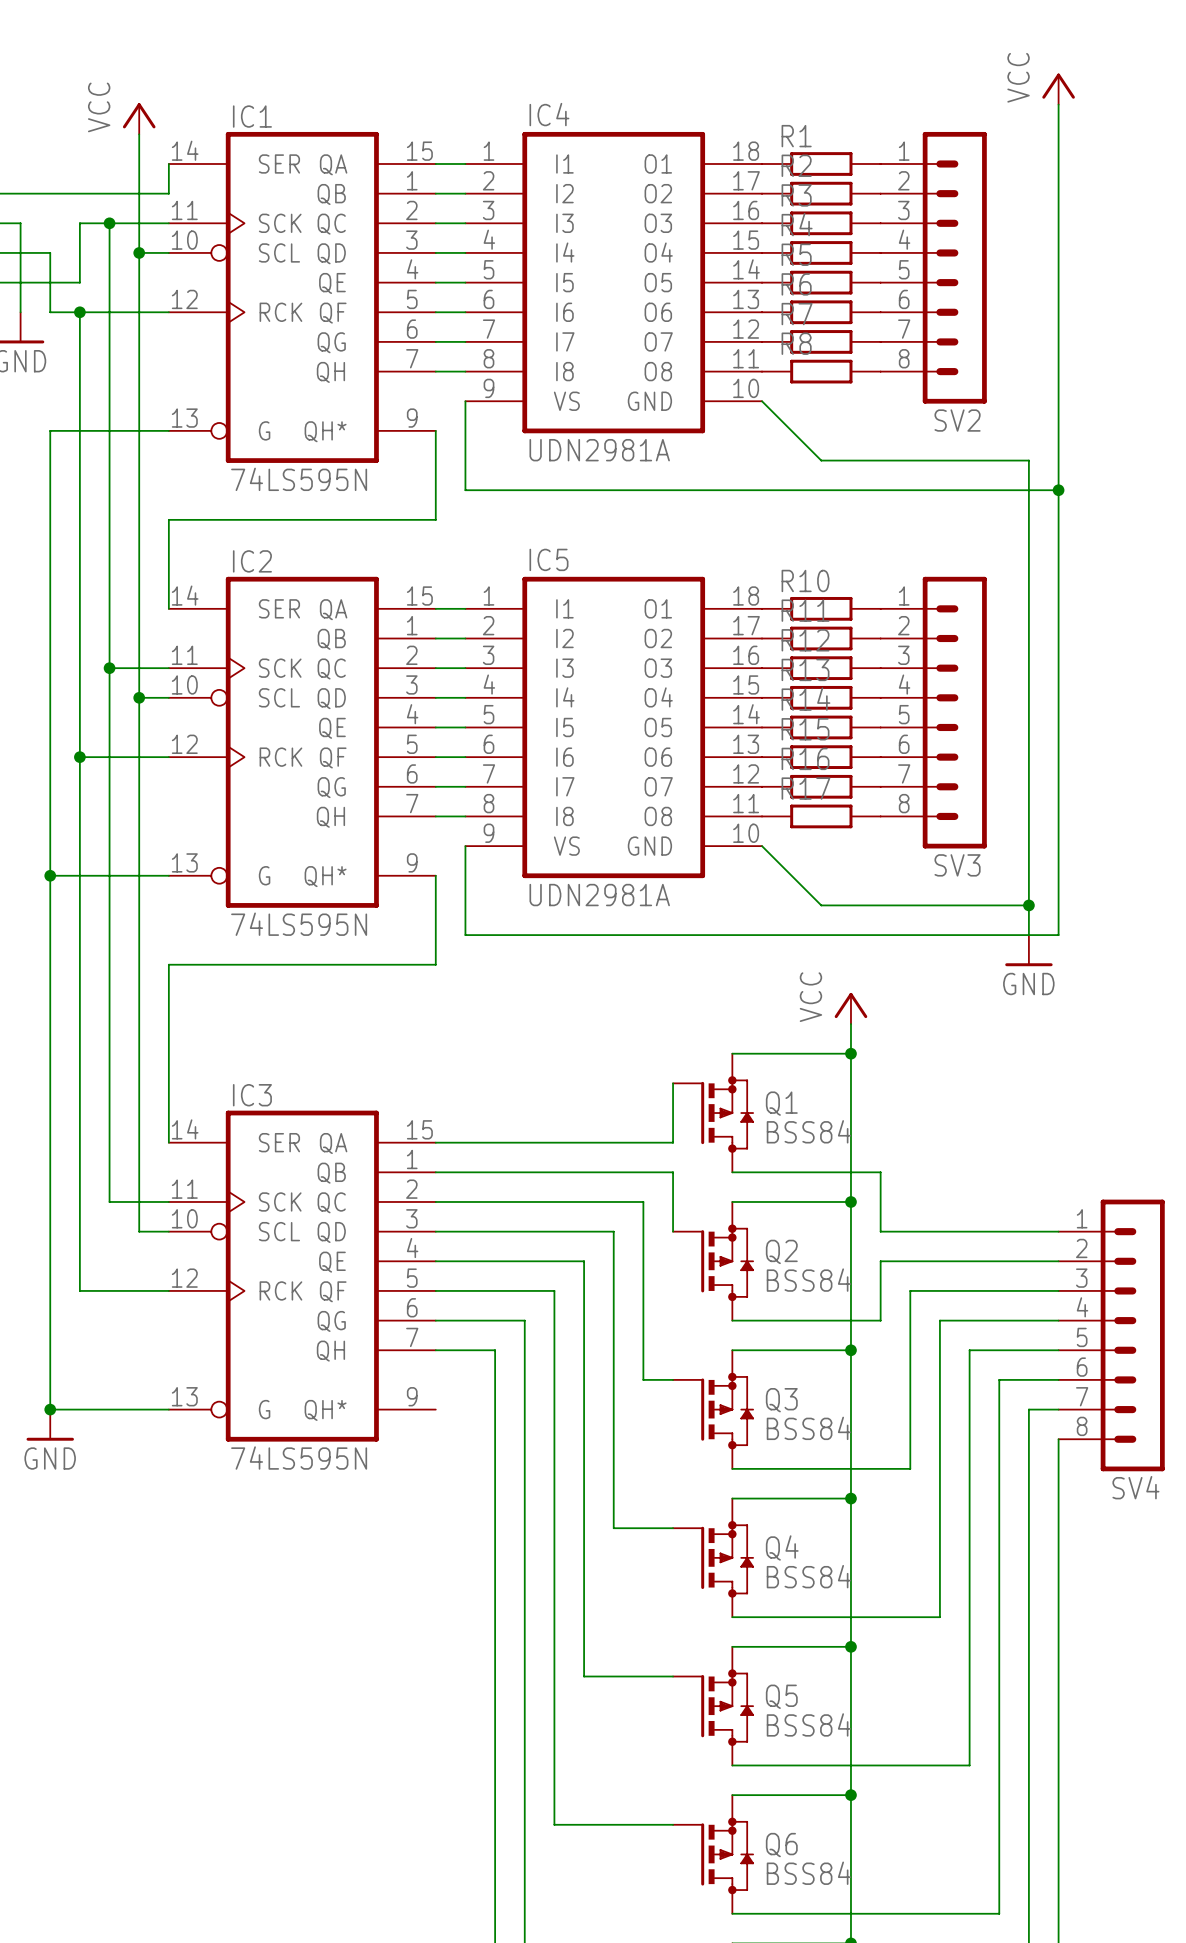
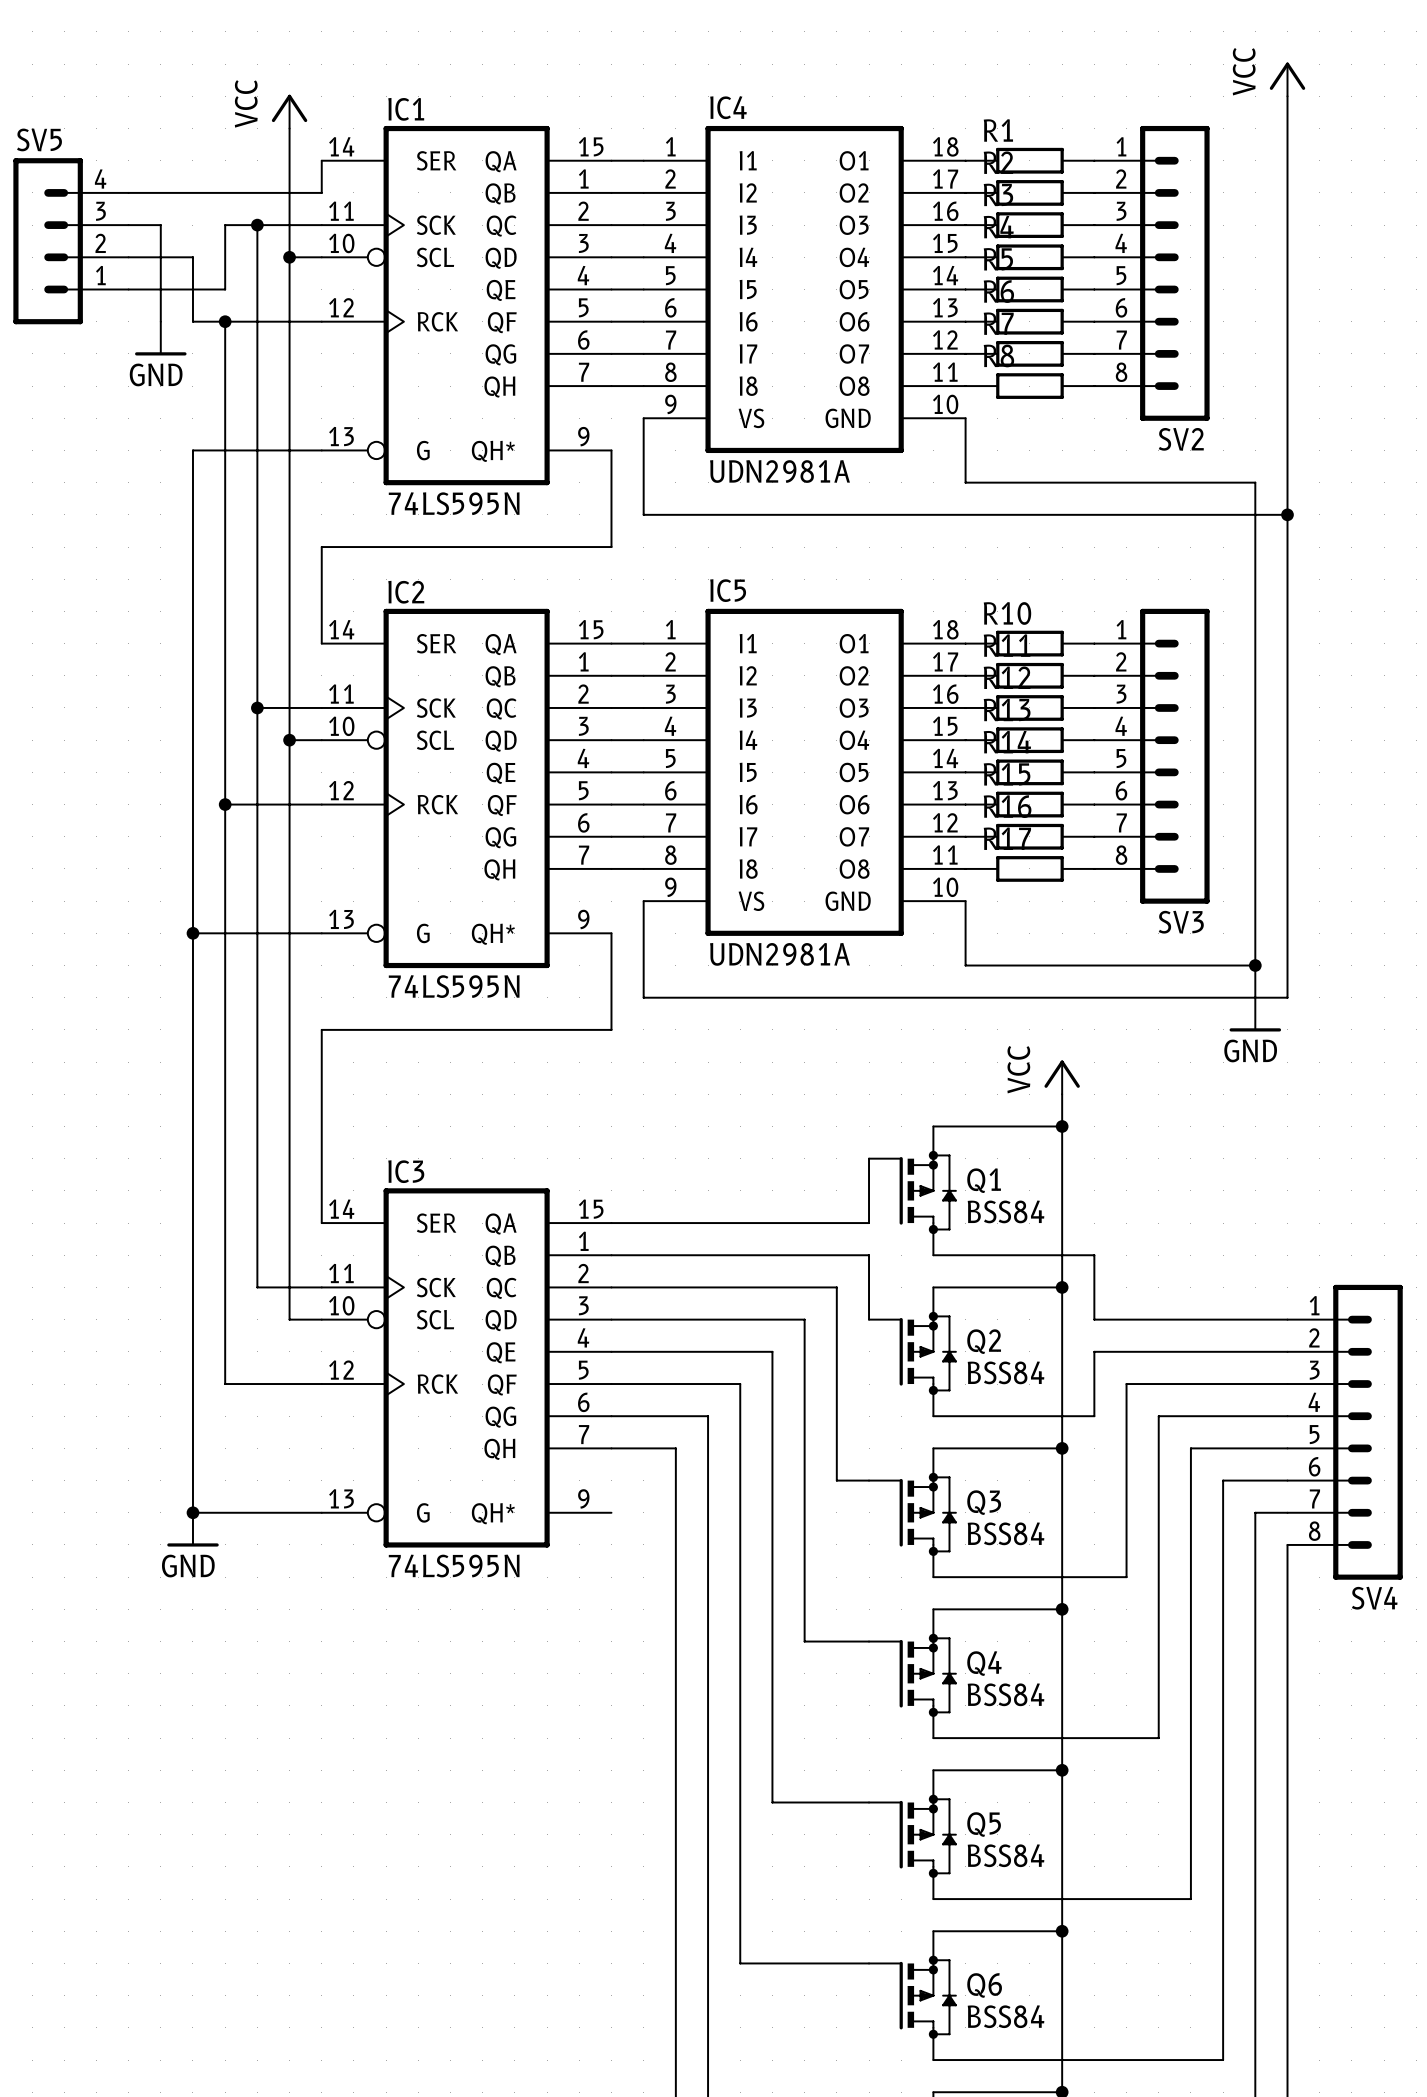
wire: (762, 401) (821, 460) -> (965, 418) (965, 482) (1029, 482)
wire: (762, 846) (821, 905) -> (965, 901) (965, 965) (1029, 965)

